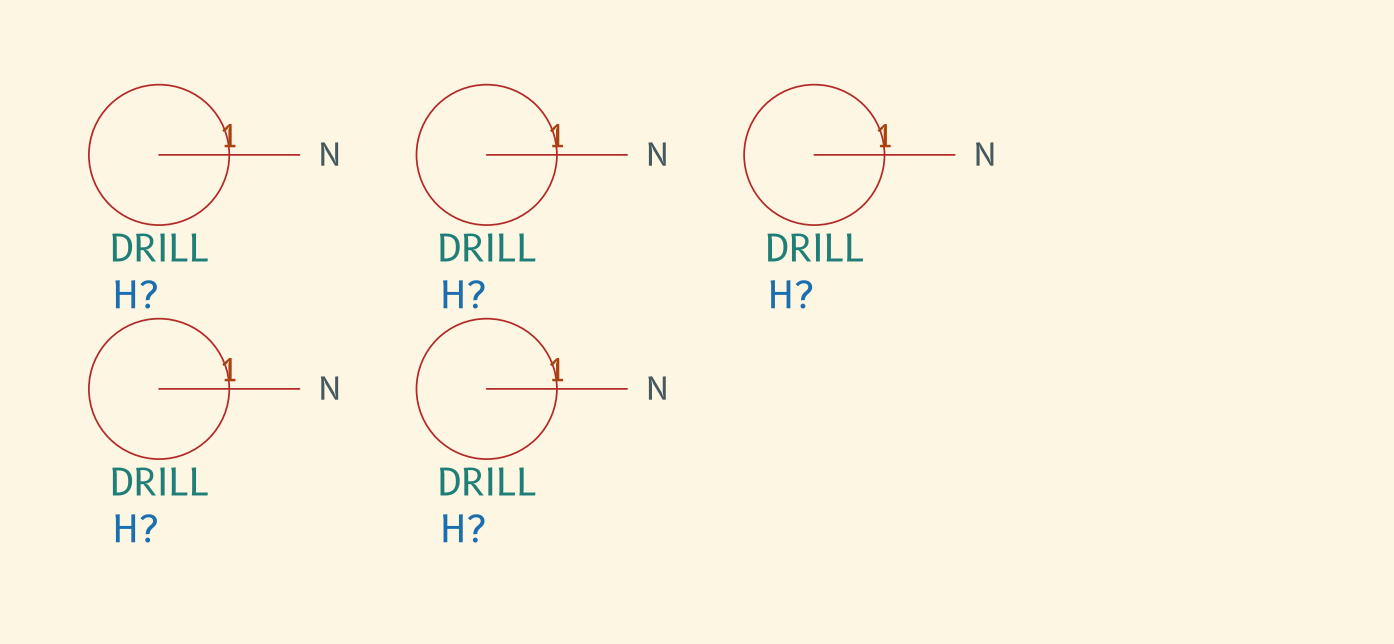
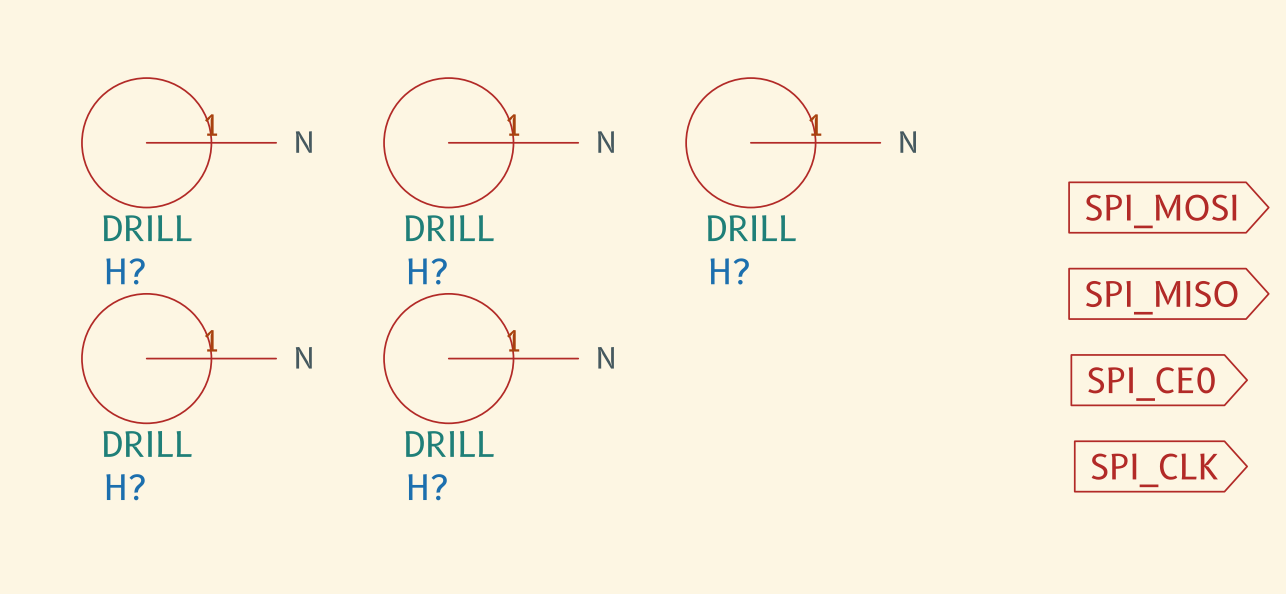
global label: none -> SPI_MOSI (1161, 211)
global label: none -> SPI_MISO (1161, 297)
global label: none -> SPI_CE0 (1151, 384)
global label: none -> SPI_CLK (1154, 470)

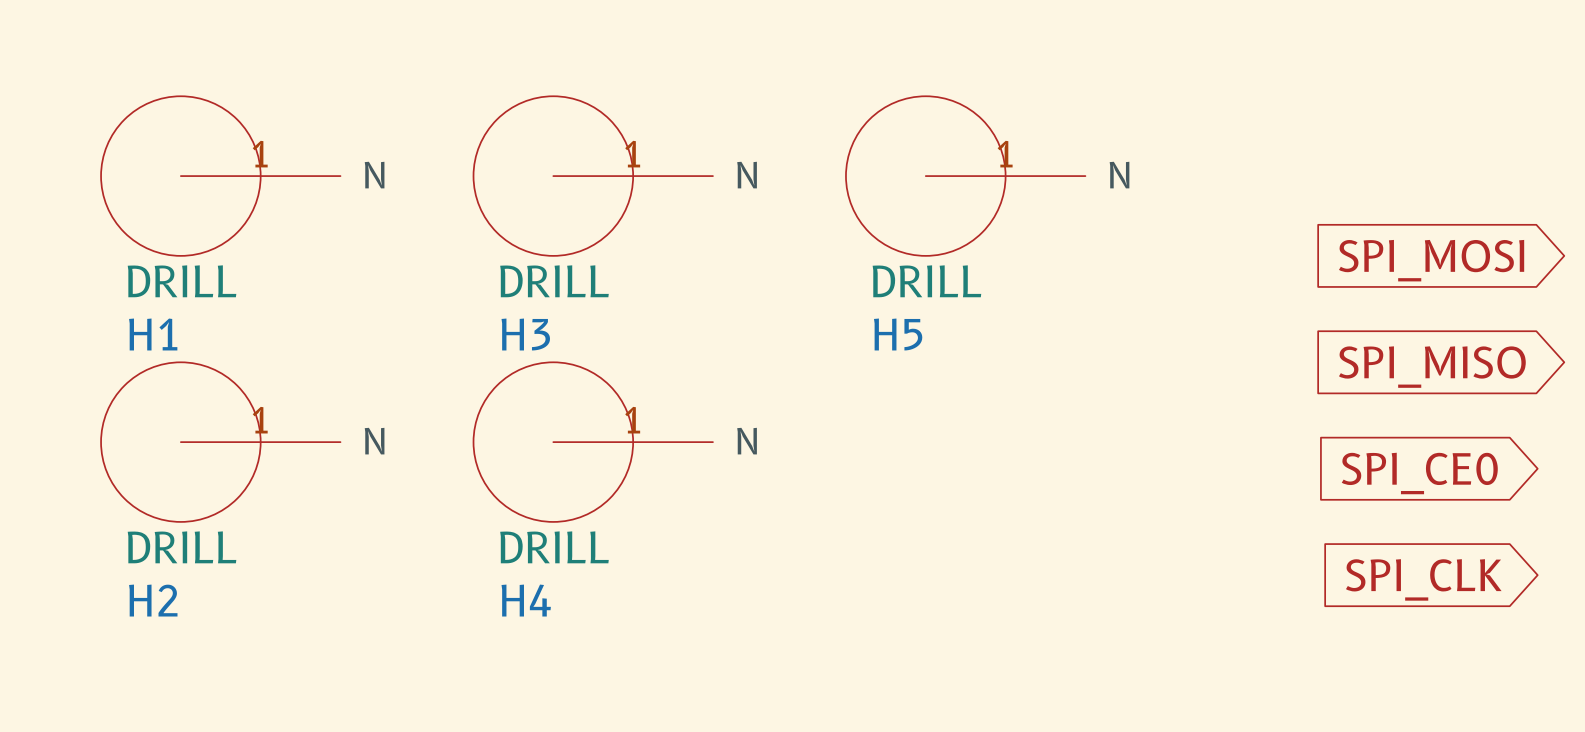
H? name: H? (125, 271) -> H1 (153, 334)
H? name: H? (427, 271) -> H3 (525, 334)
H? name: H? (729, 271) -> H5 (898, 334)
H? name: H? (125, 487) -> H2 (153, 600)
H? name: H? (427, 487) -> H4 (526, 600)

